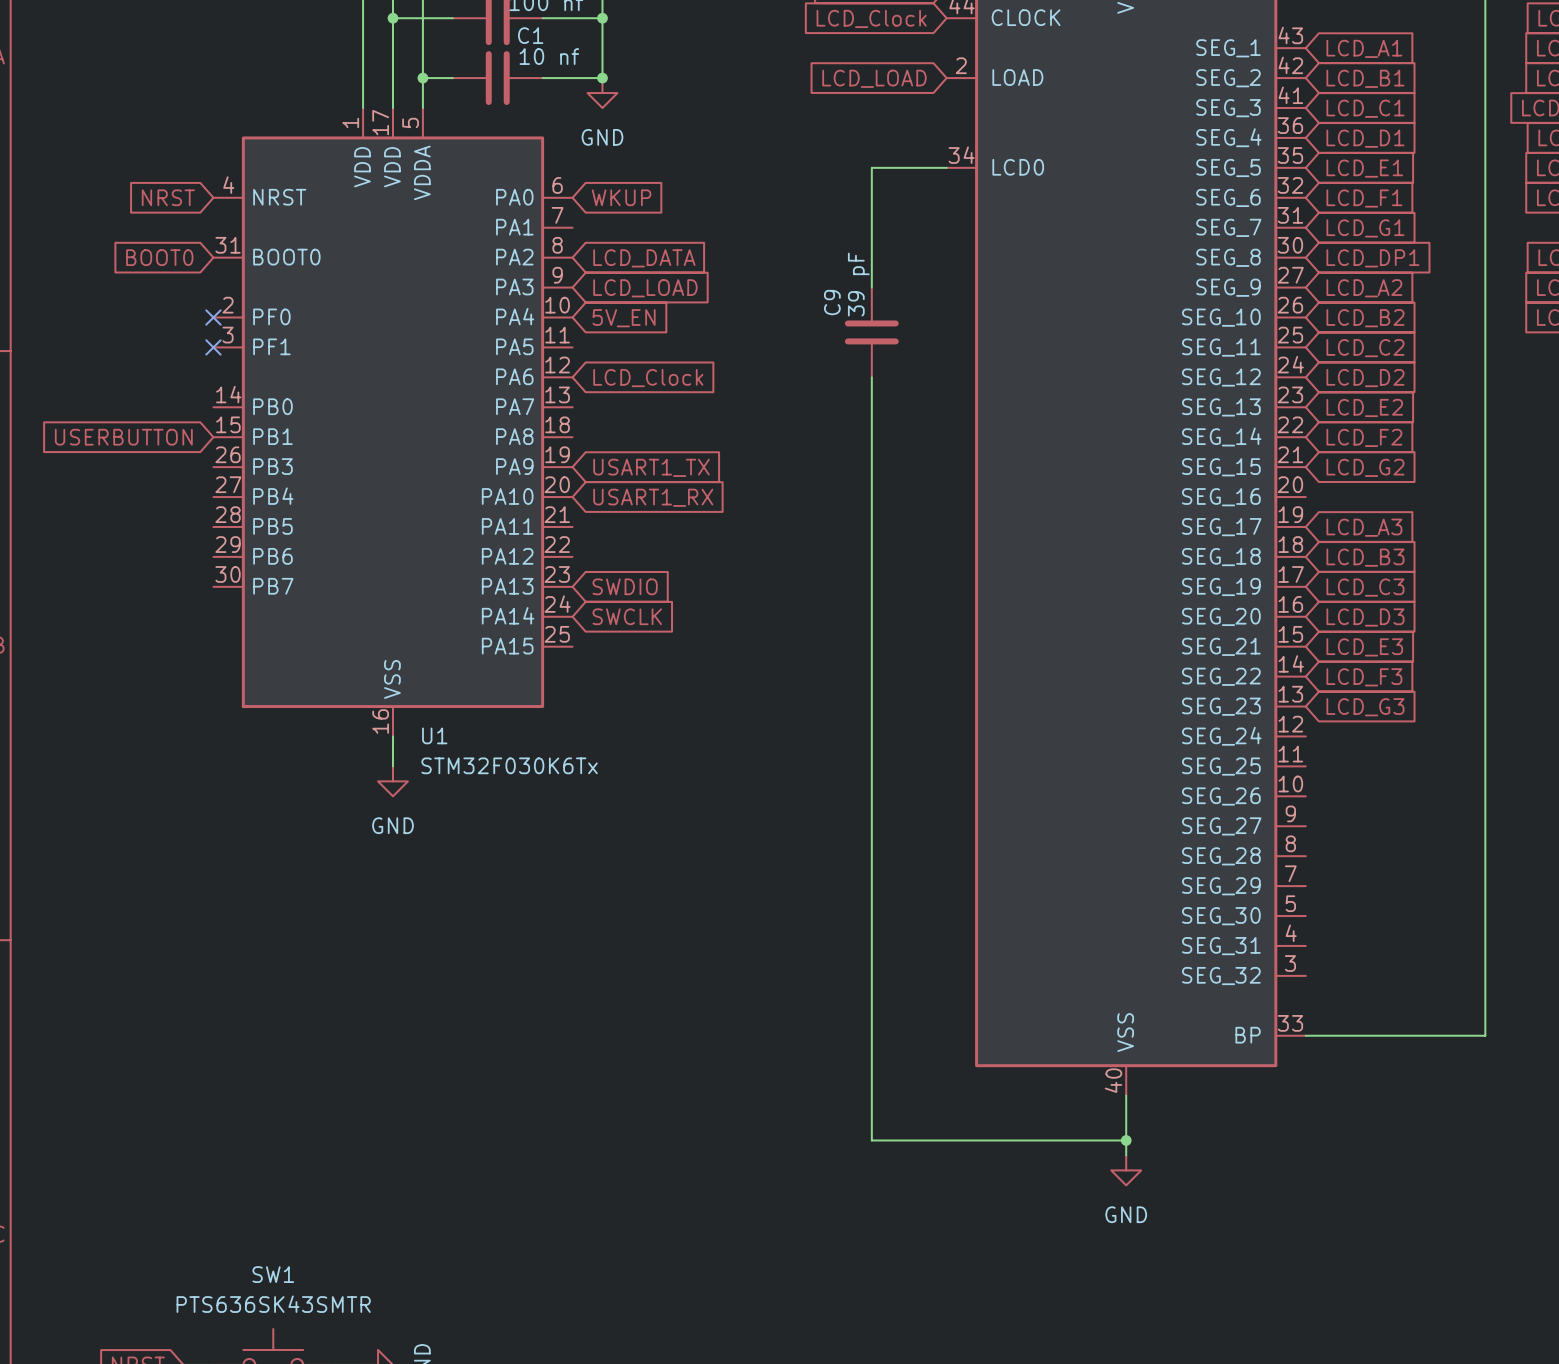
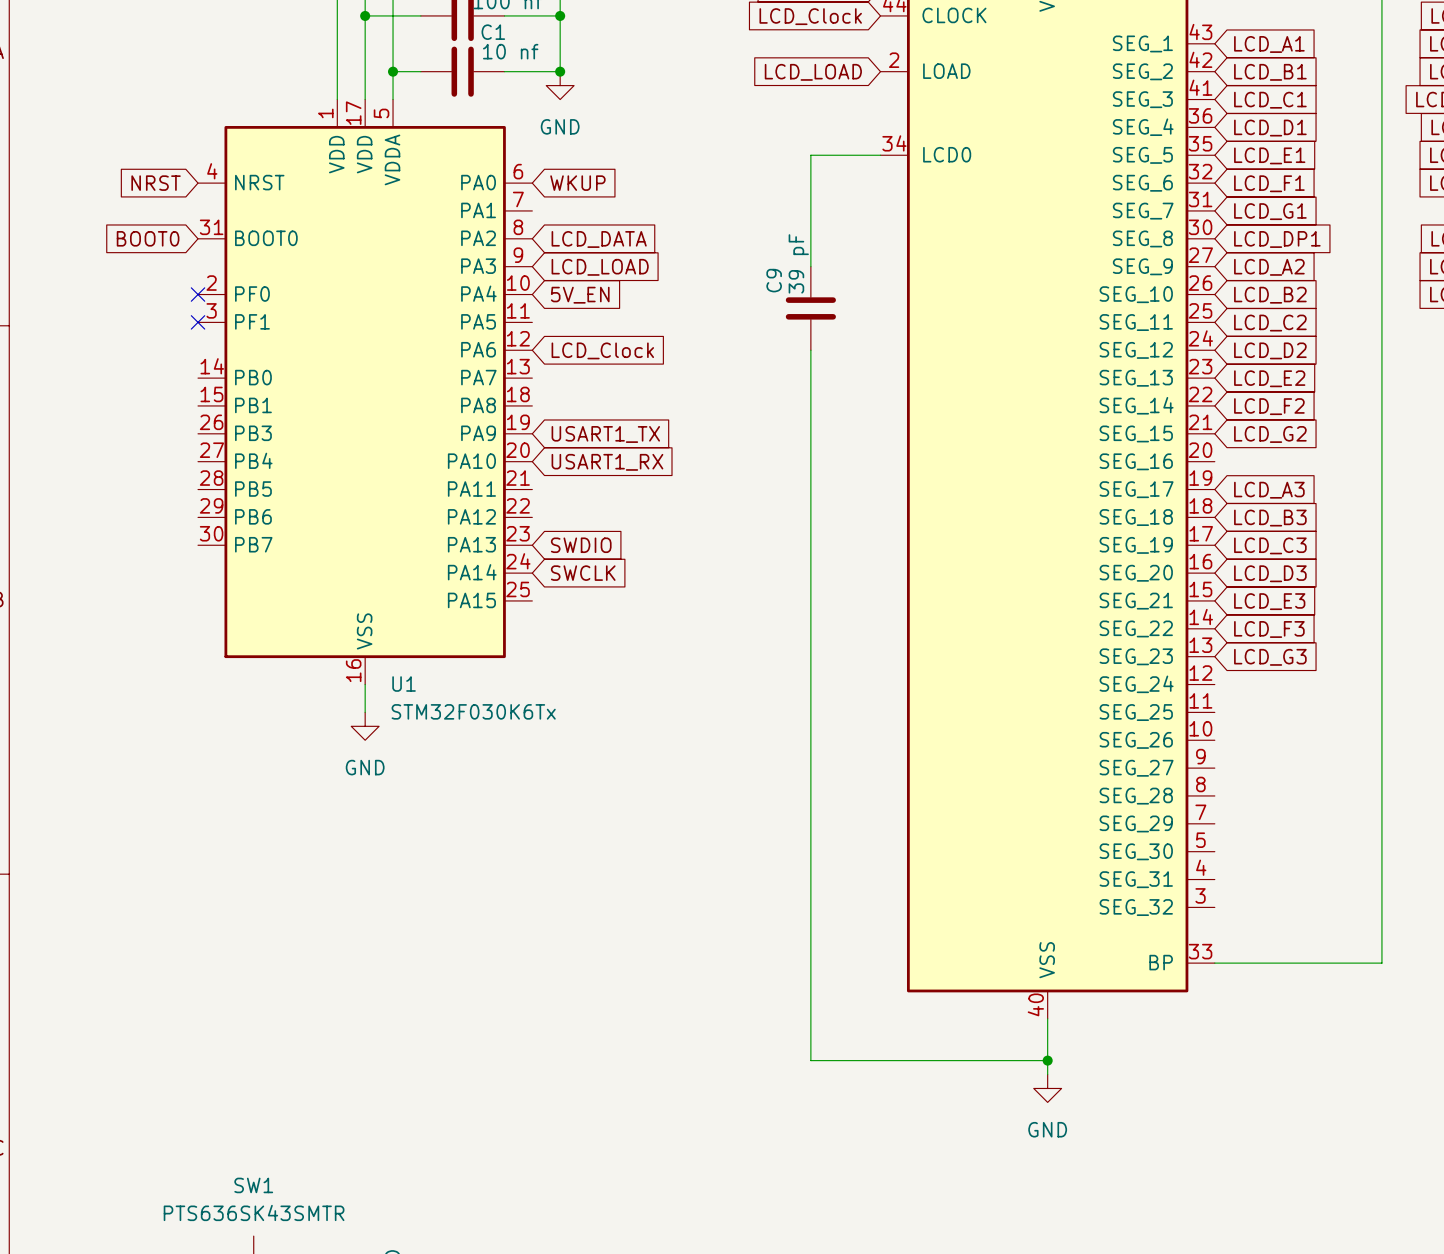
global label: USERBUTTON (123, 437) -> none

